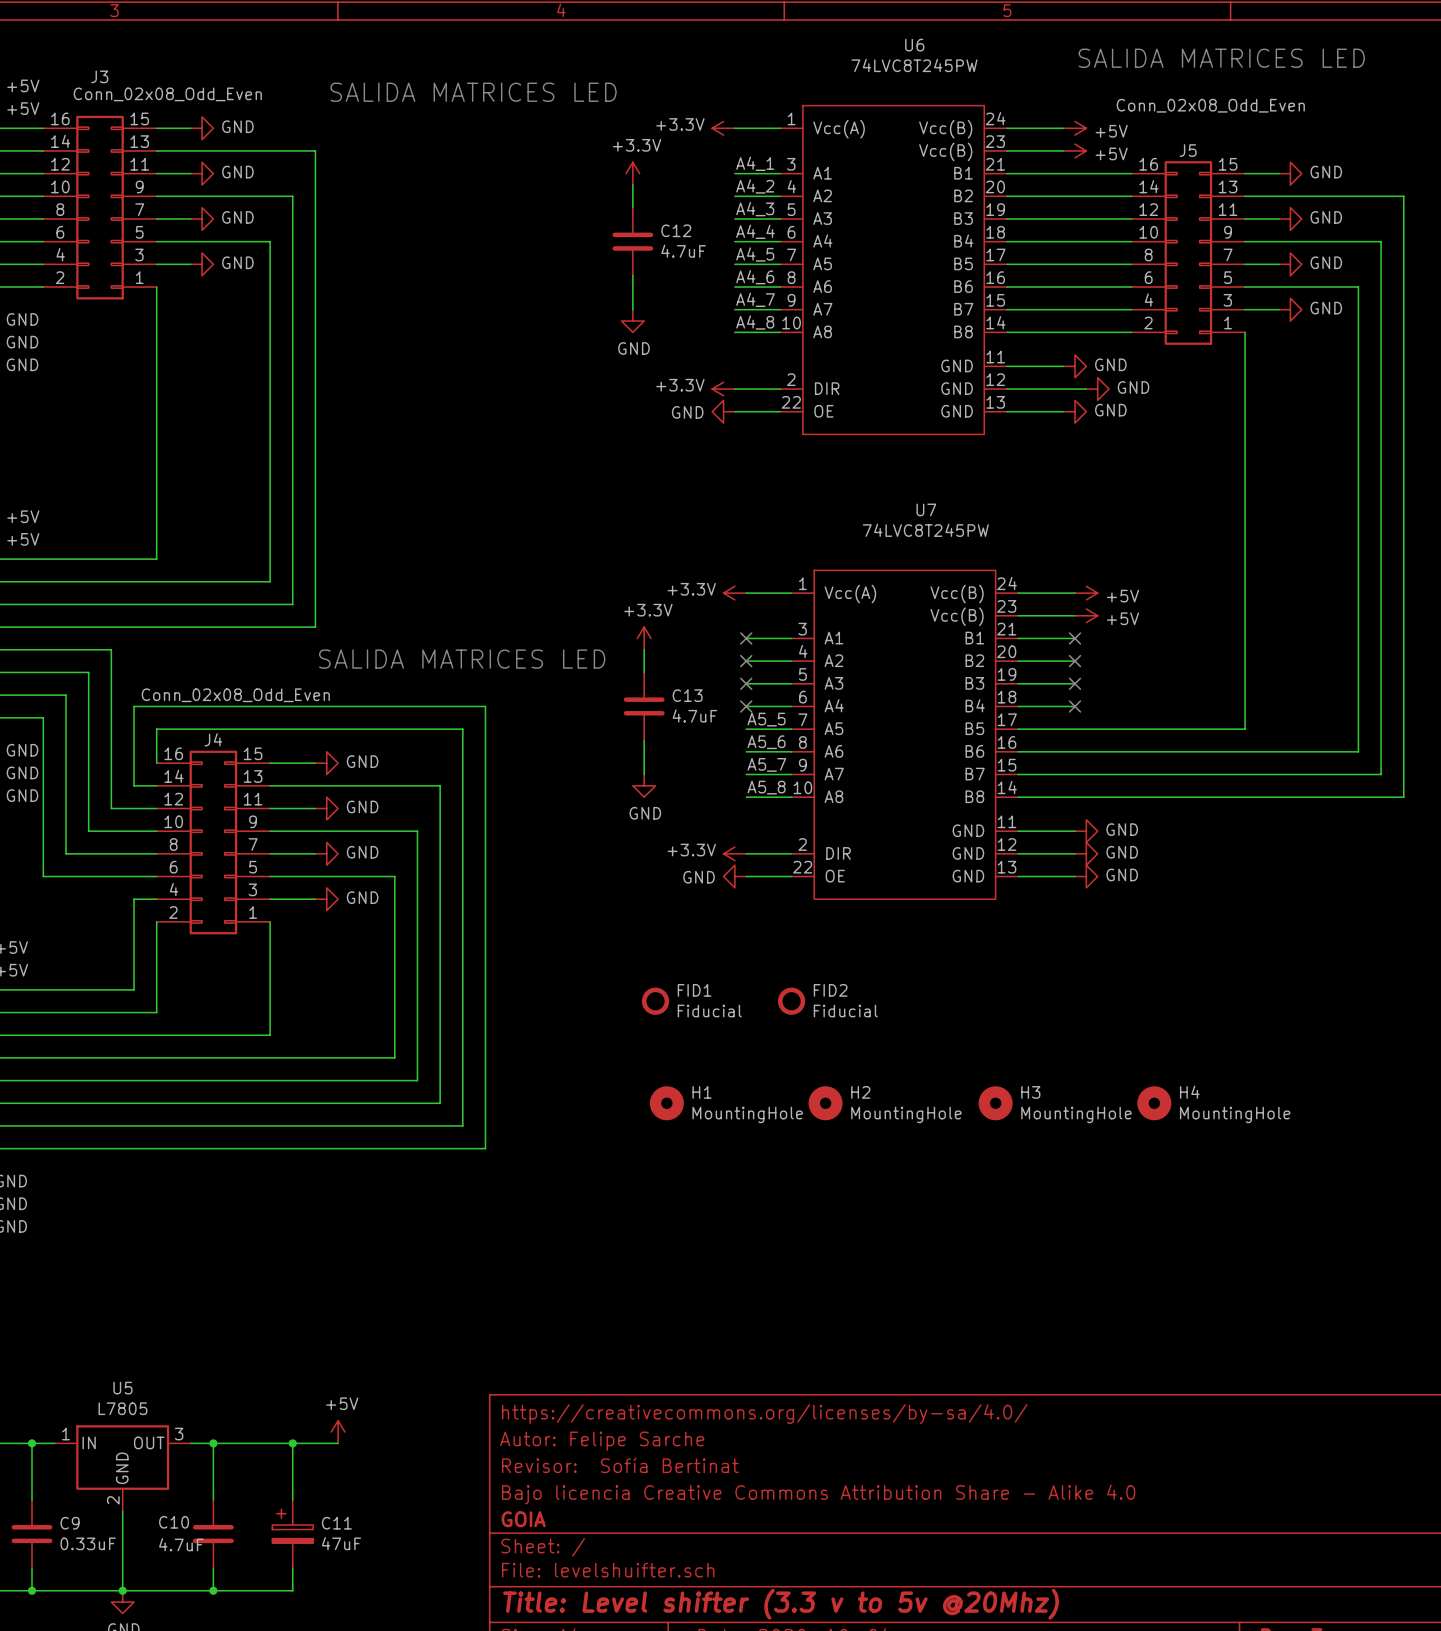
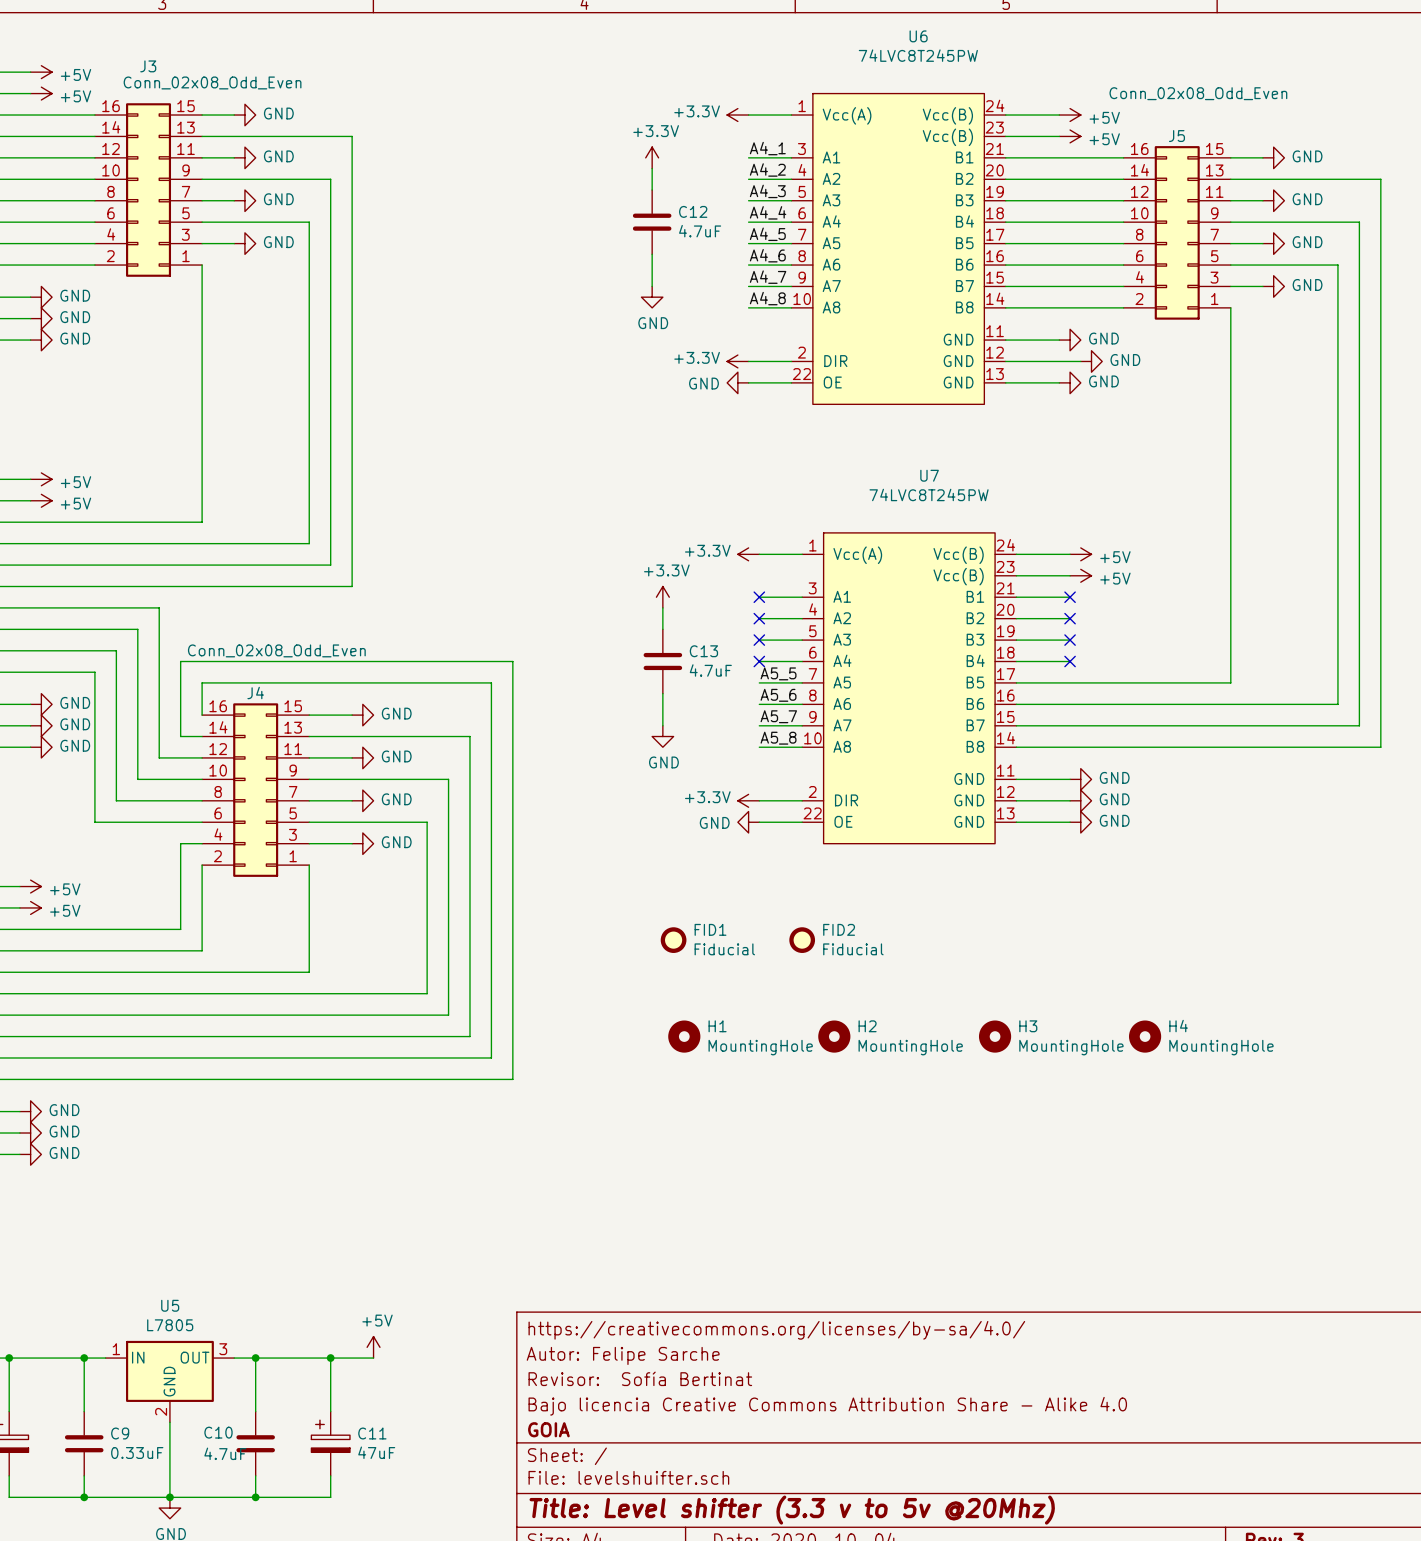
text: SALIDA MATRICES LED (1221, 58) -> none
text: SALIDA MATRICES LED (473, 92) -> none
text: SALIDA MATRICES LED (462, 659) -> none

